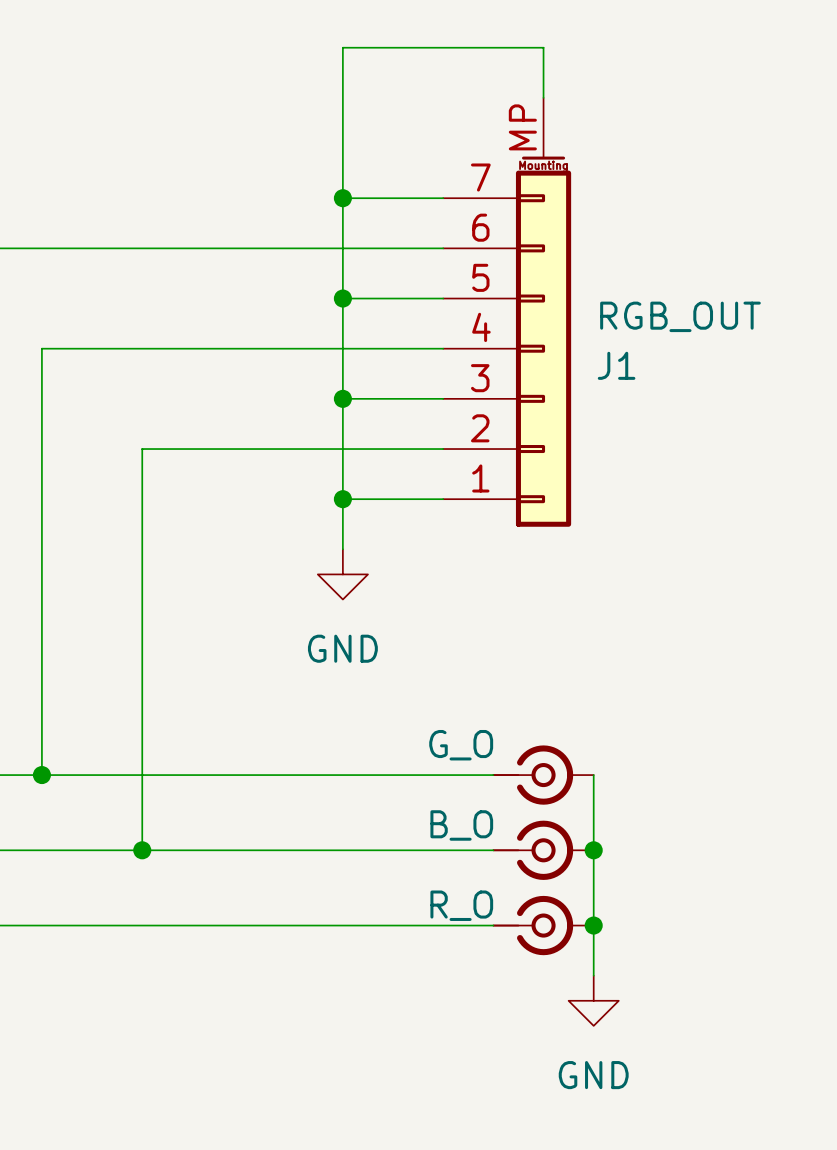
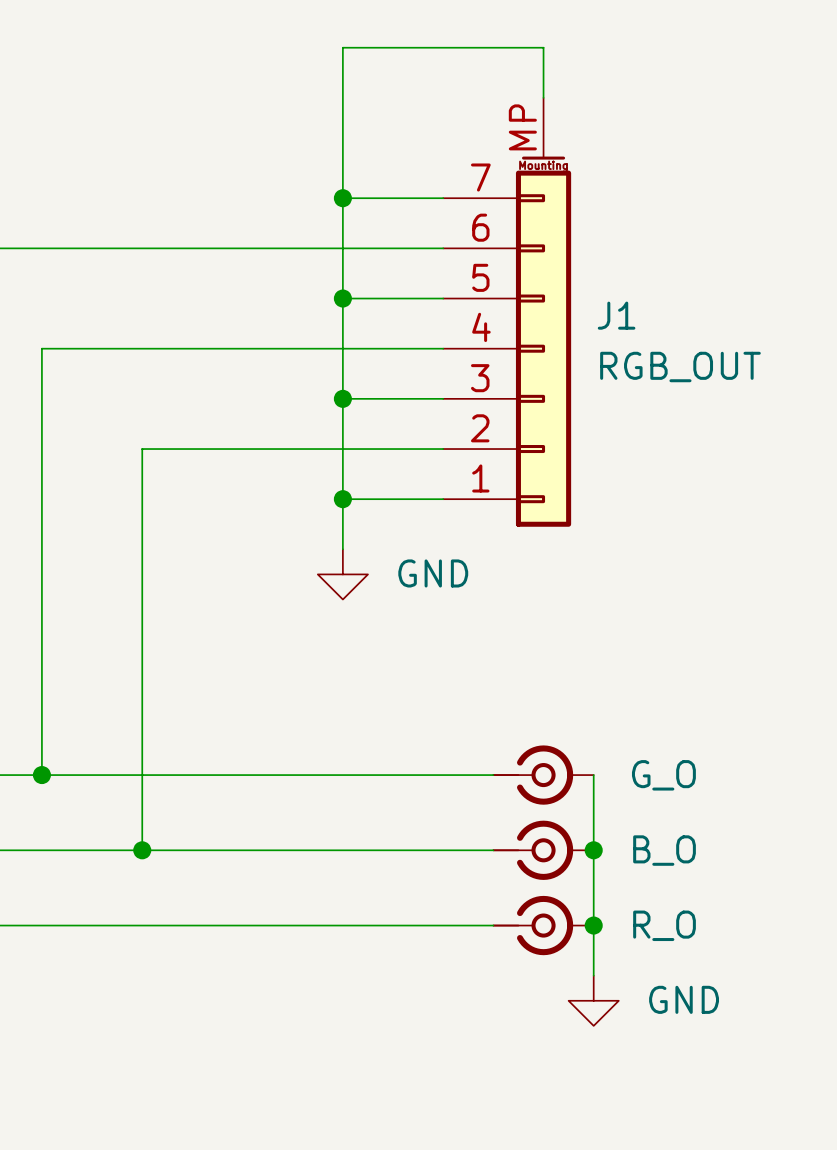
J1 value position: RGB_OUT (680, 316) -> RGB_OUT (680, 367)
J1 name position: J1 (616, 365) -> J1 (616, 315)
power symbol text position: GND (342, 648) -> GND (433, 573)
part value position: G_O (461, 745) -> G_O (663, 775)
part value position: B_O (461, 825) -> B_O (664, 850)
part value position: R_O (461, 905) -> R_O (664, 925)
power symbol text position: GND (593, 1075) -> GND (684, 999)

